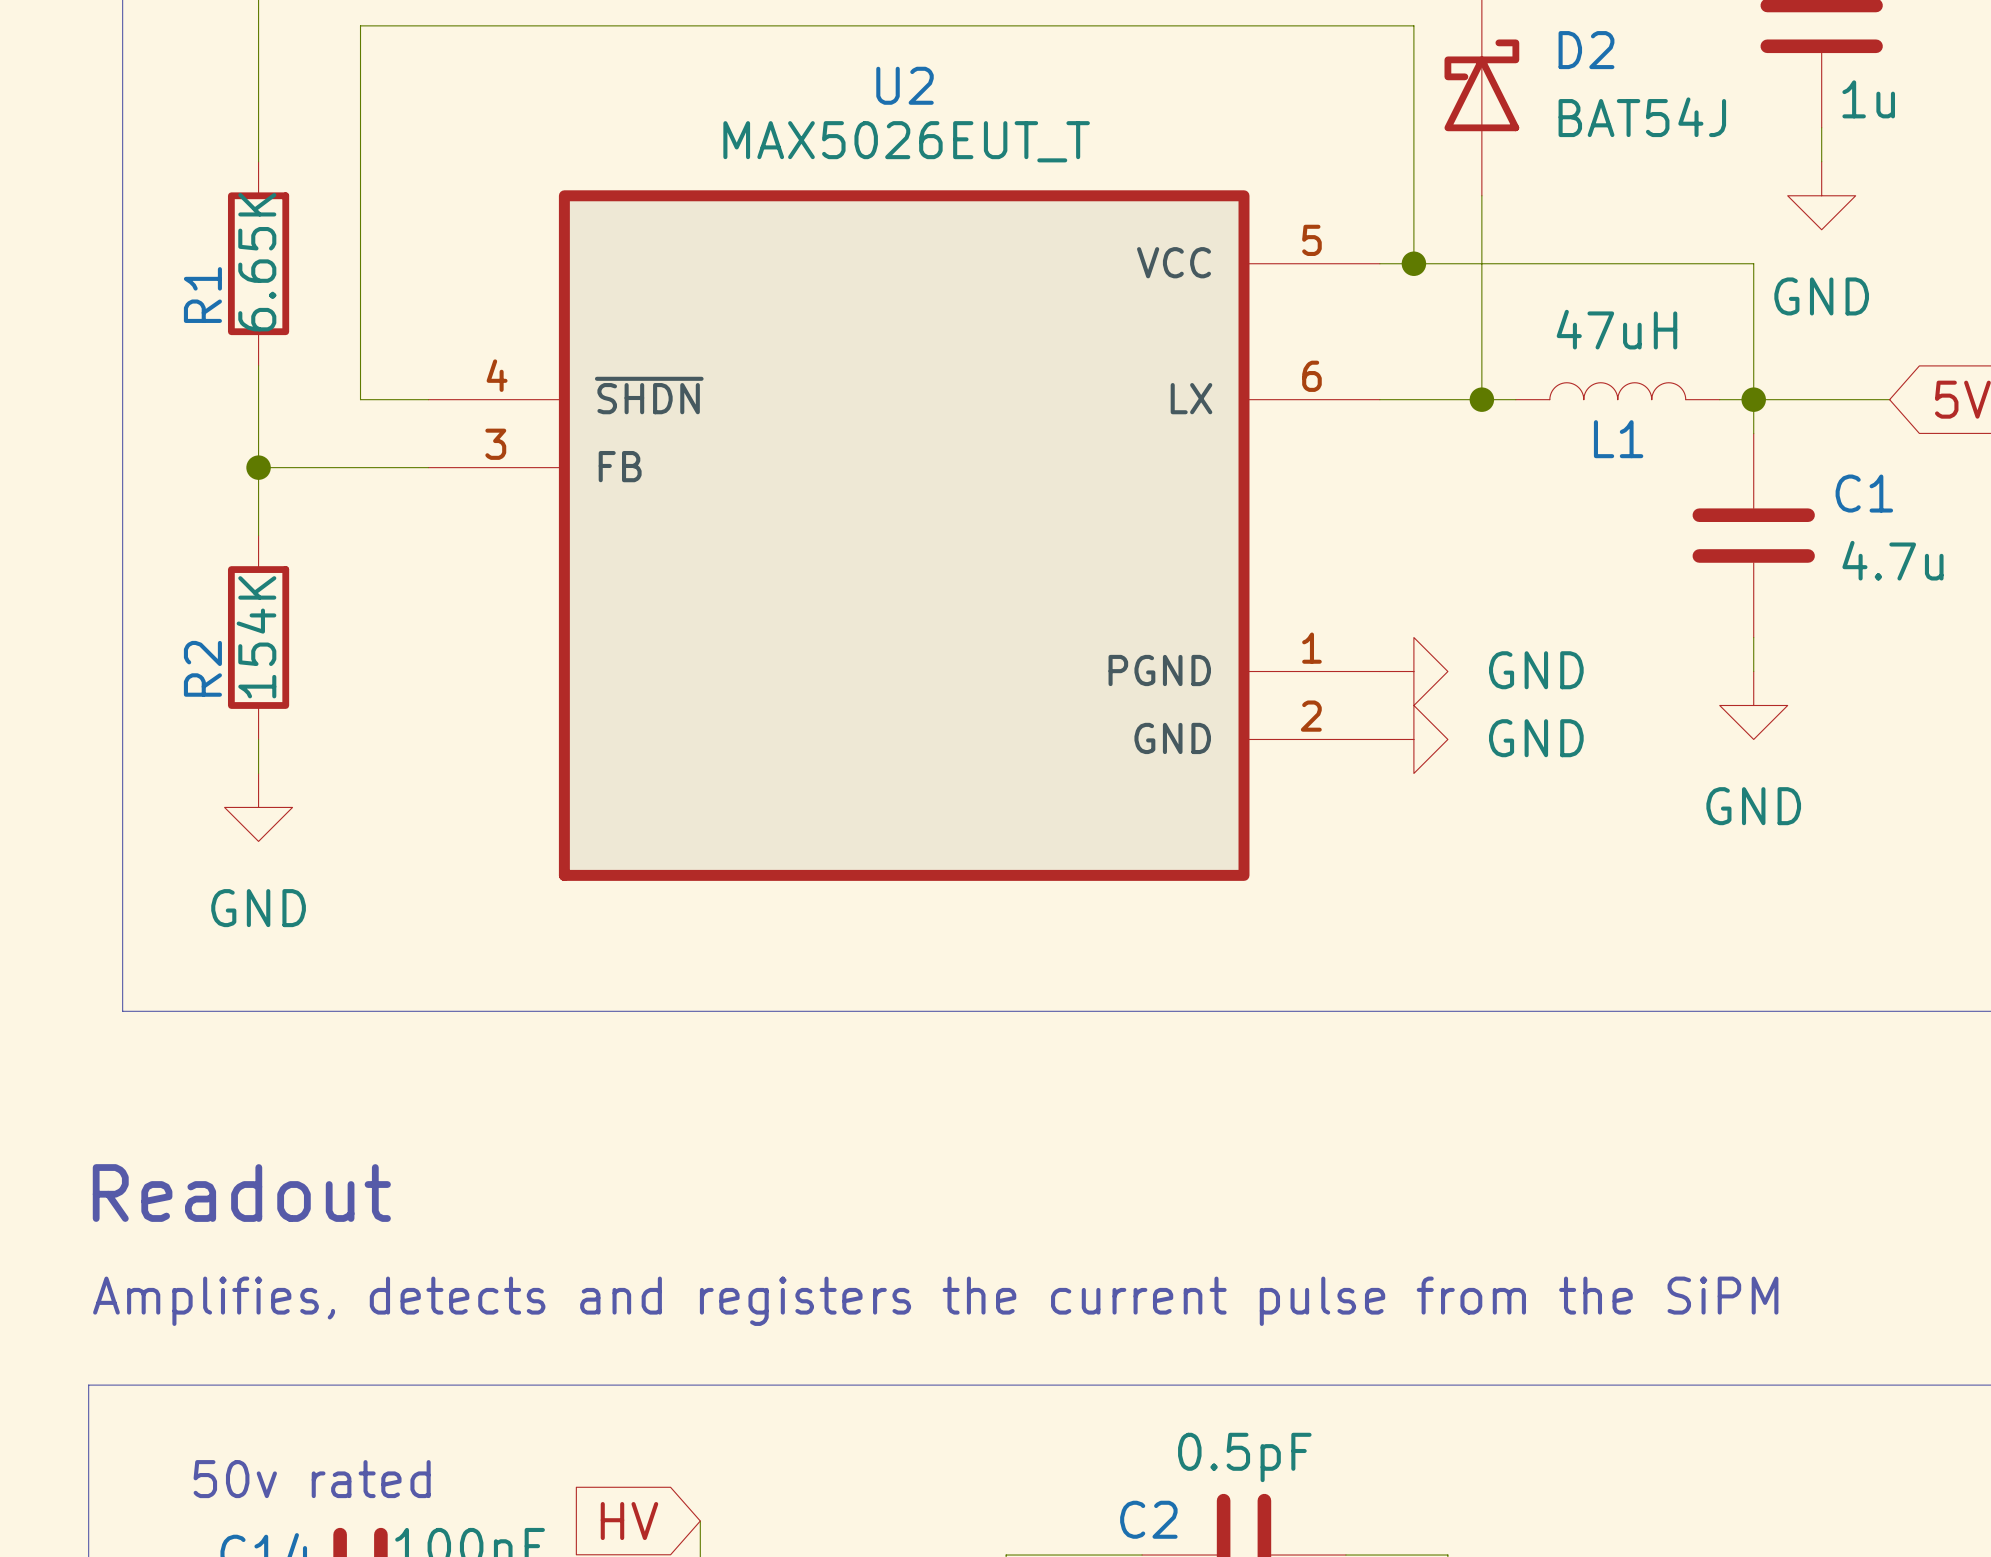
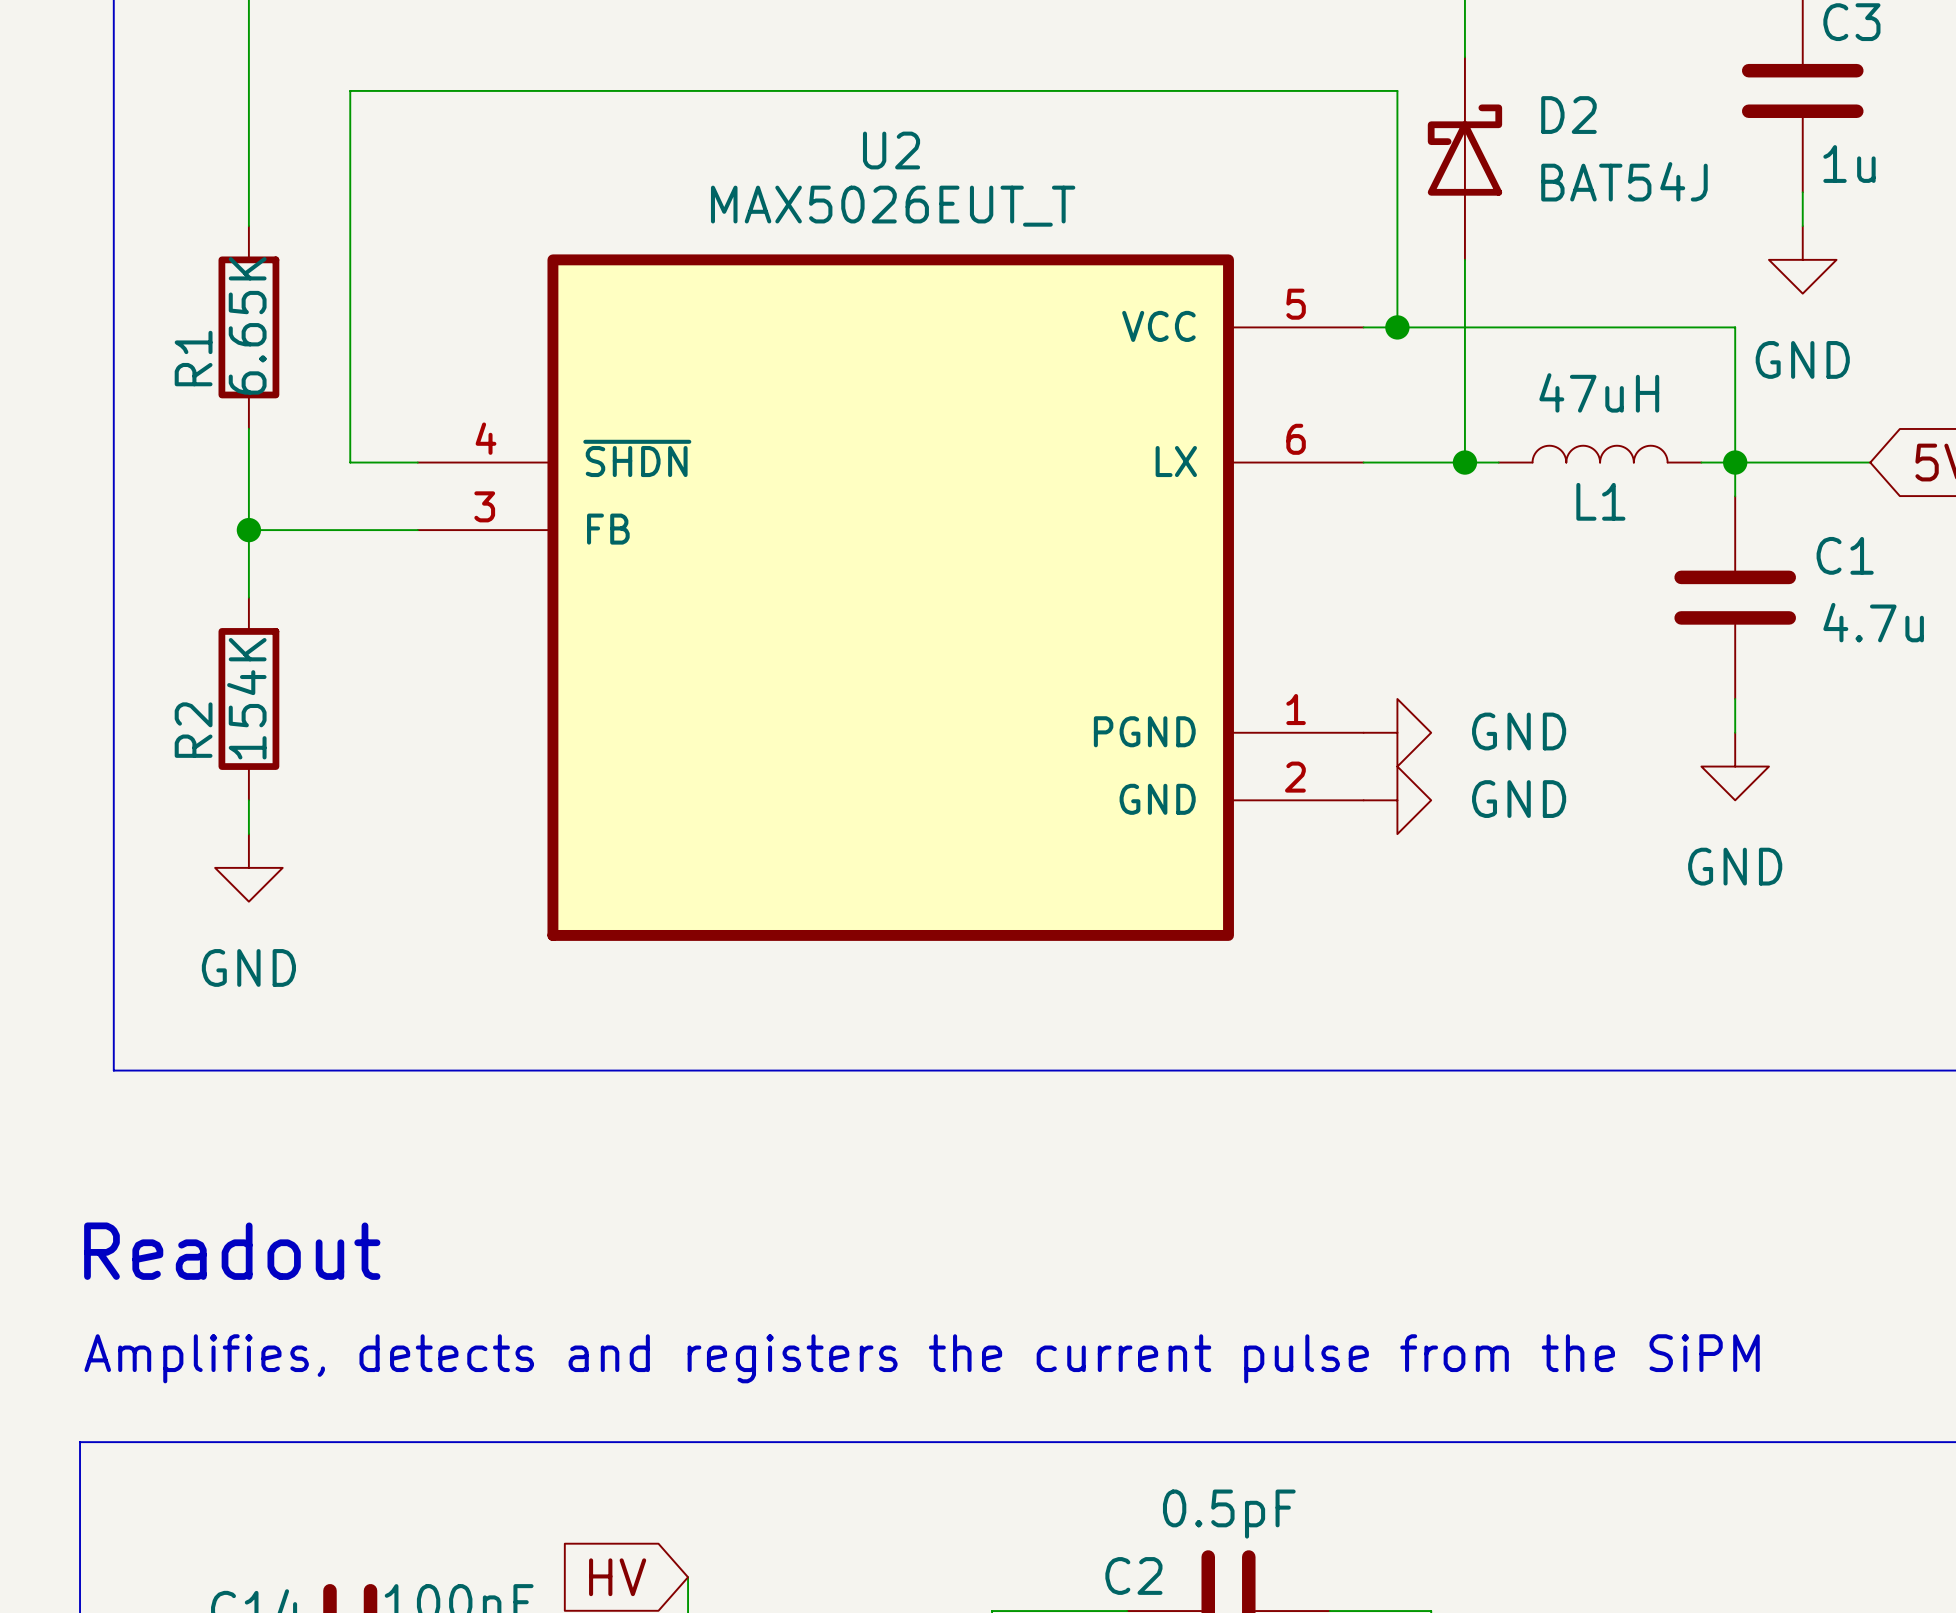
text: 50v rated (312, 1479) -> none

